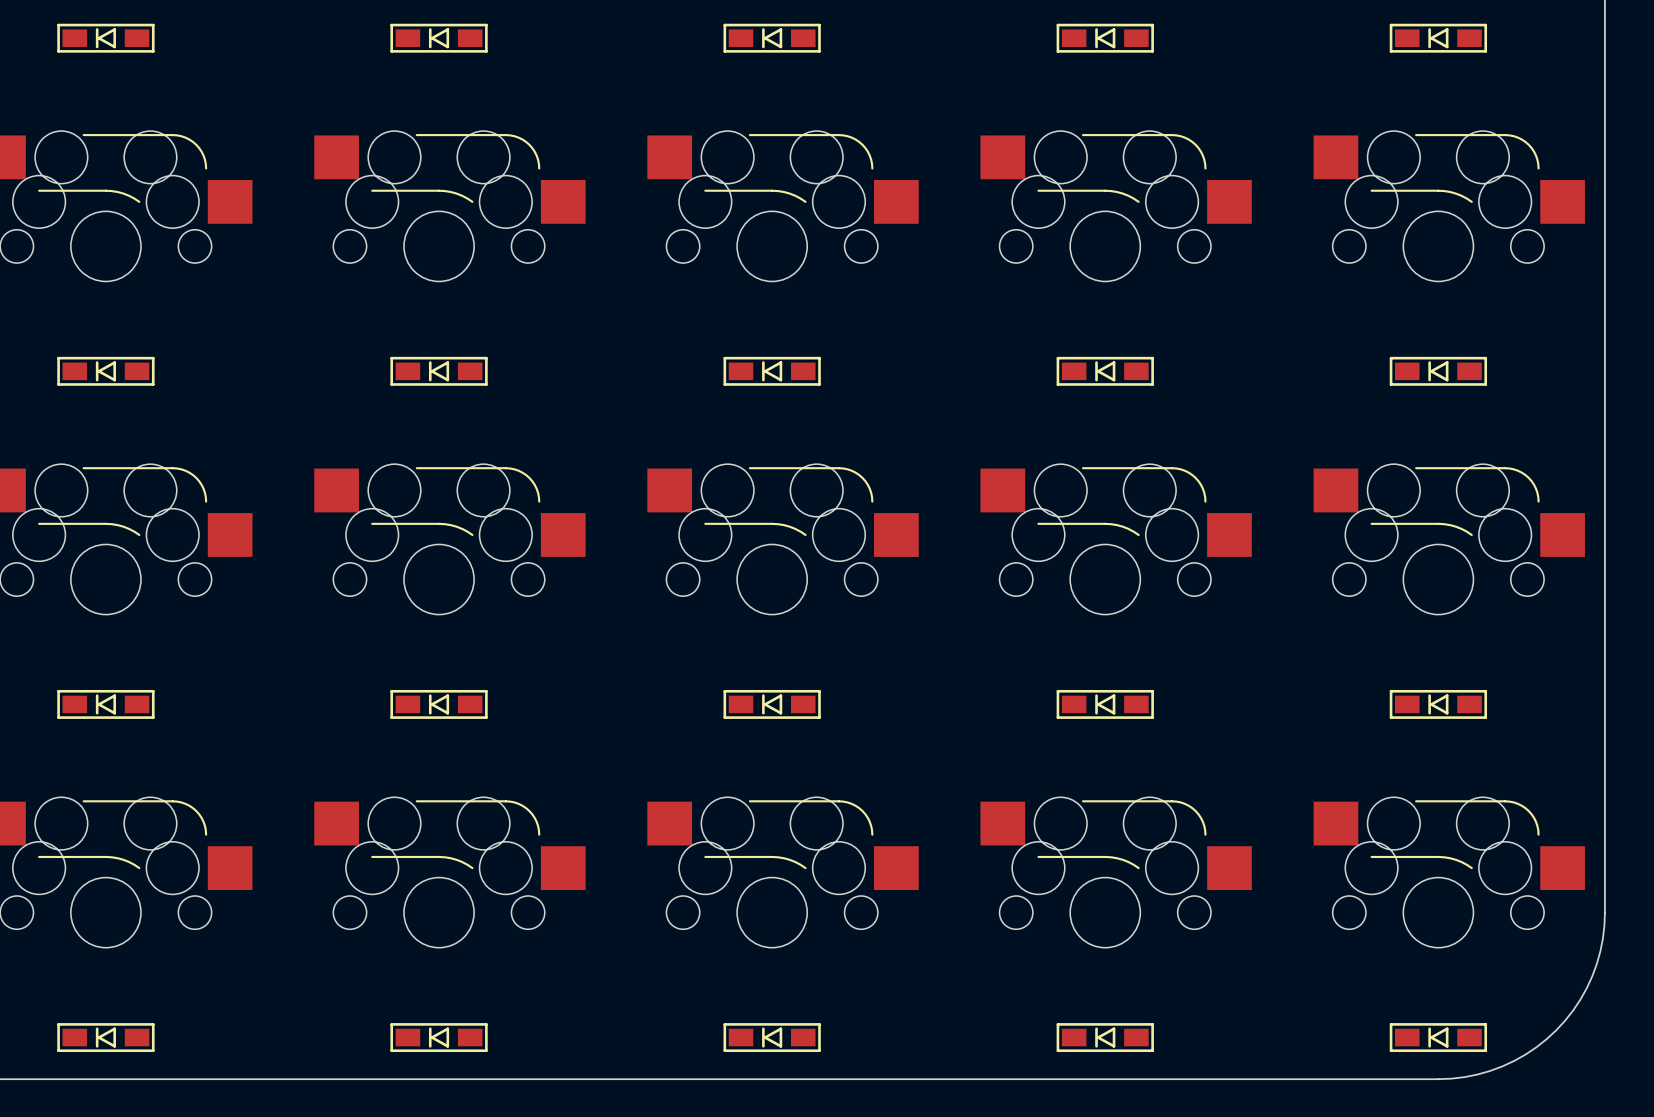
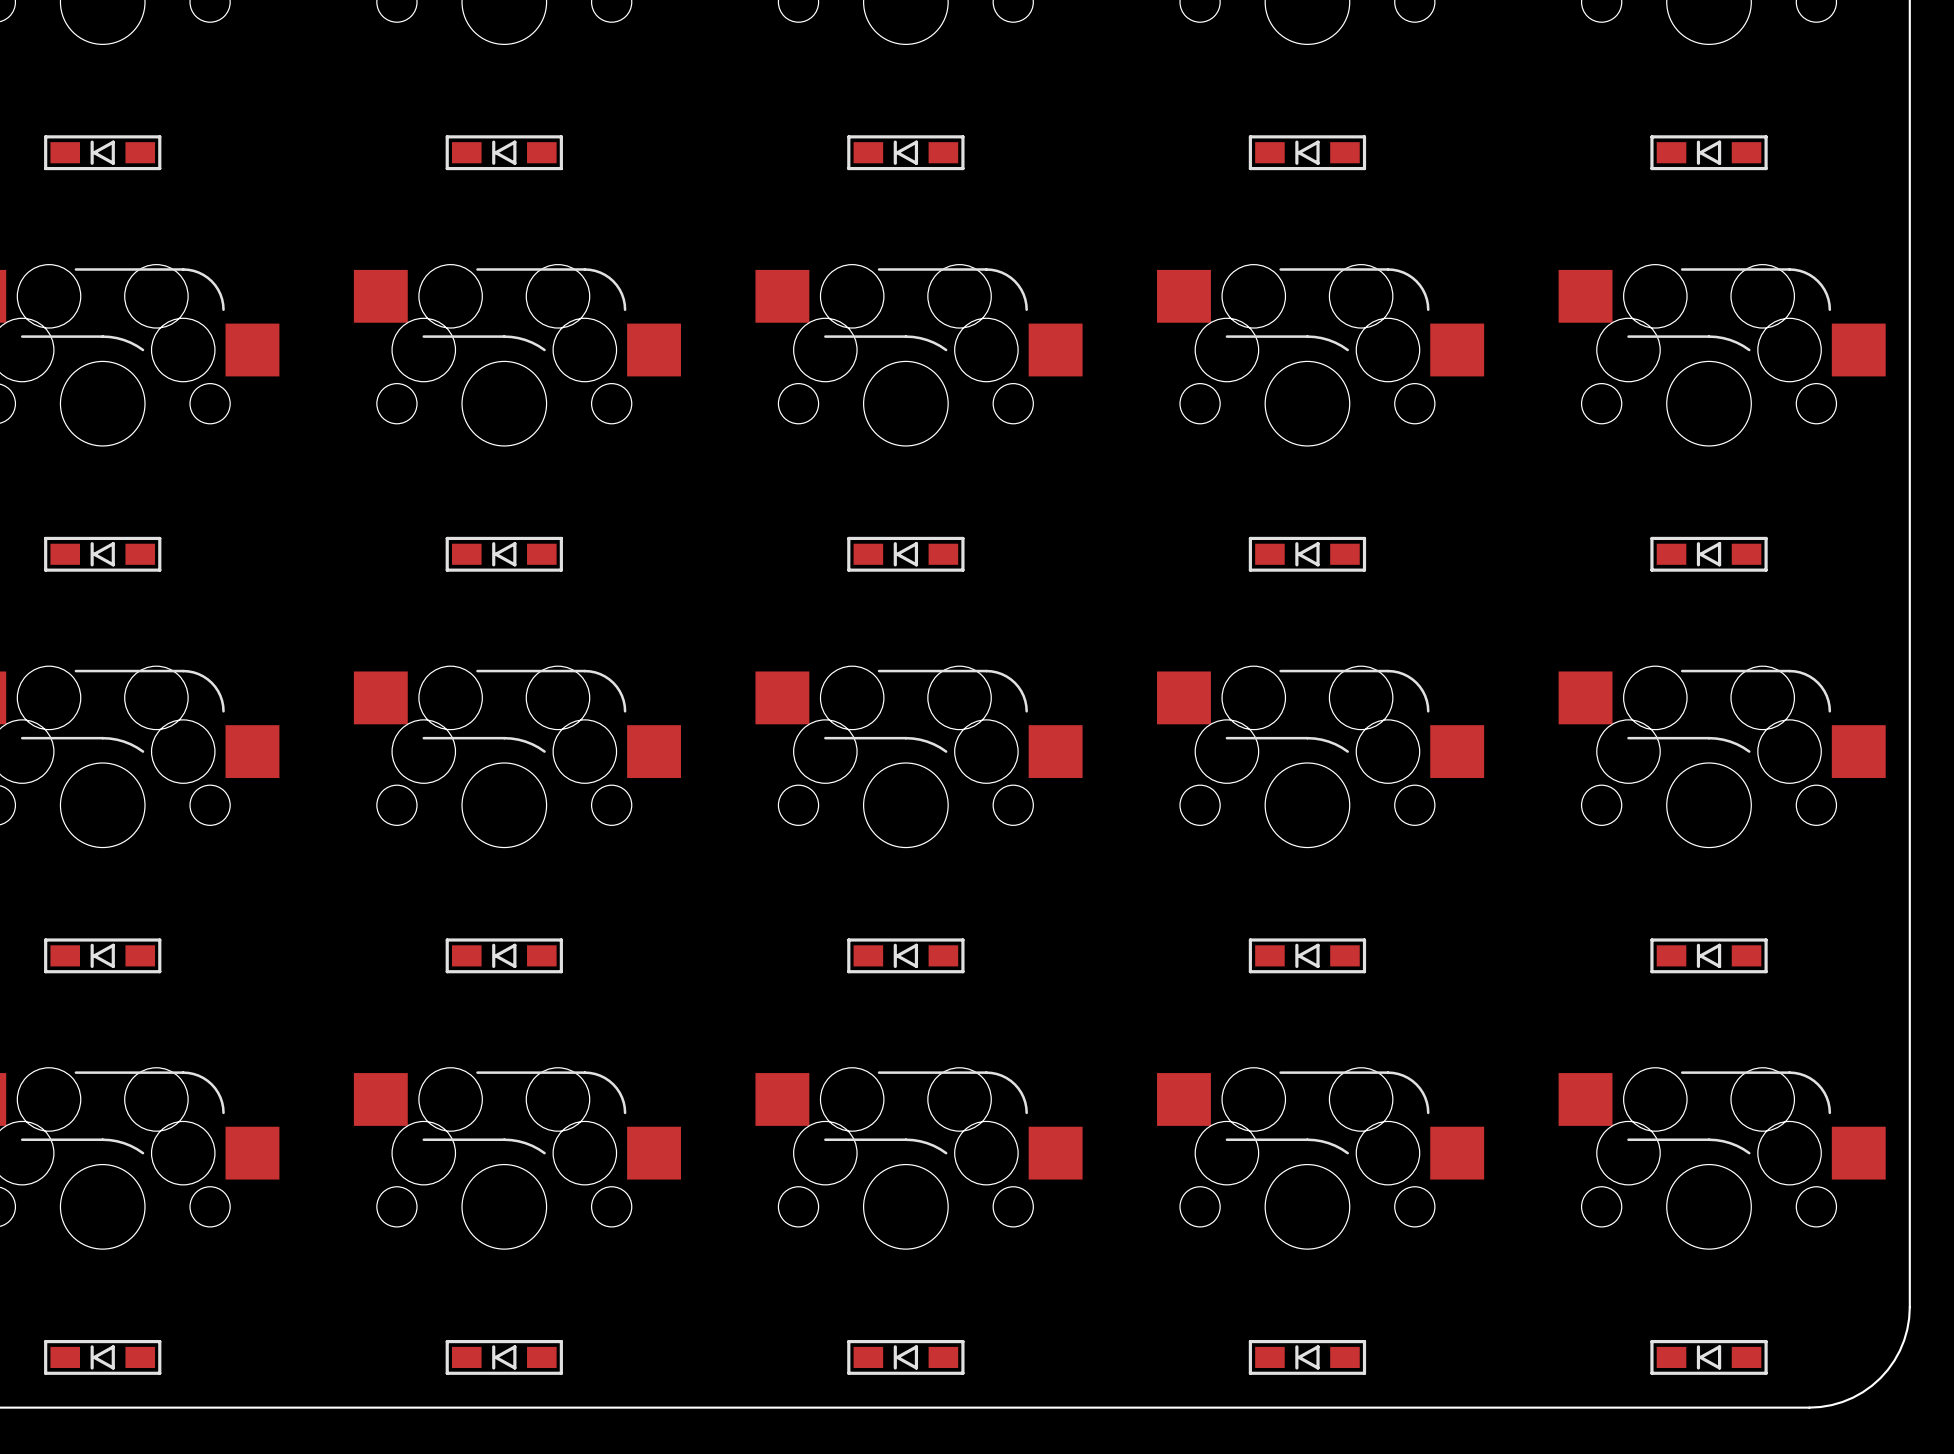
board edge: (1604, 912) (1602, 938) (1592, 976) (1580, 999) (1556, 1030) (1536, 1047) (1502, 1066) (1477, 1074) (1438, 1079) -> (1909, 1206) (1909, 1307) (1907, 1329) (1894, 1360) (1880, 1378) (1862, 1392) (1831, 1405) (1809, 1407) (1709, 1407)

